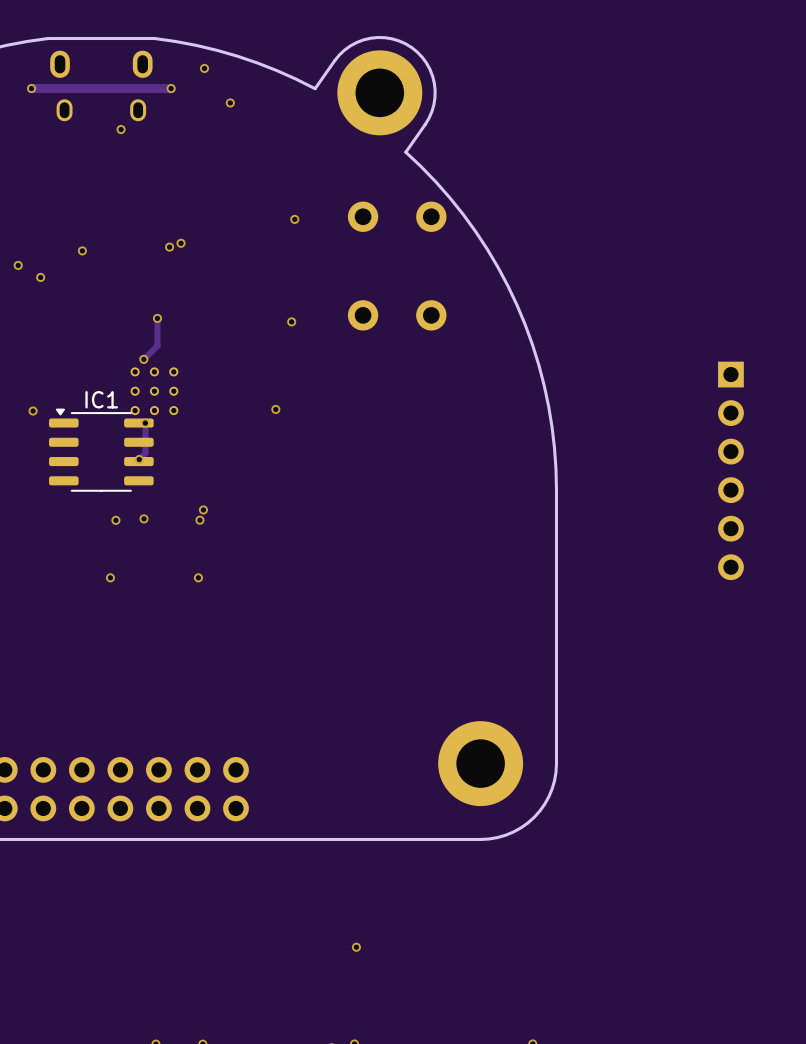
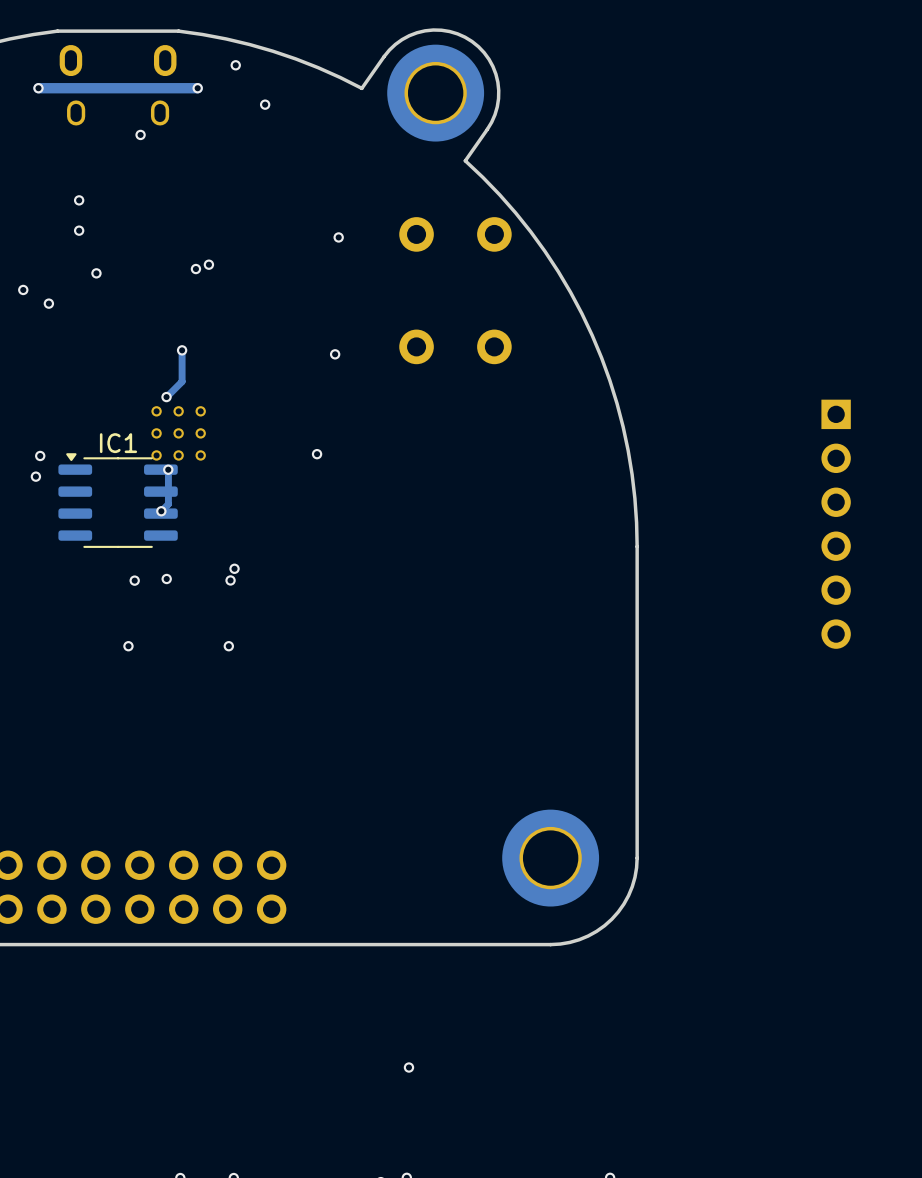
via: none -> (79, 200)
via: none -> (79, 230)
via: none -> (35, 476)

